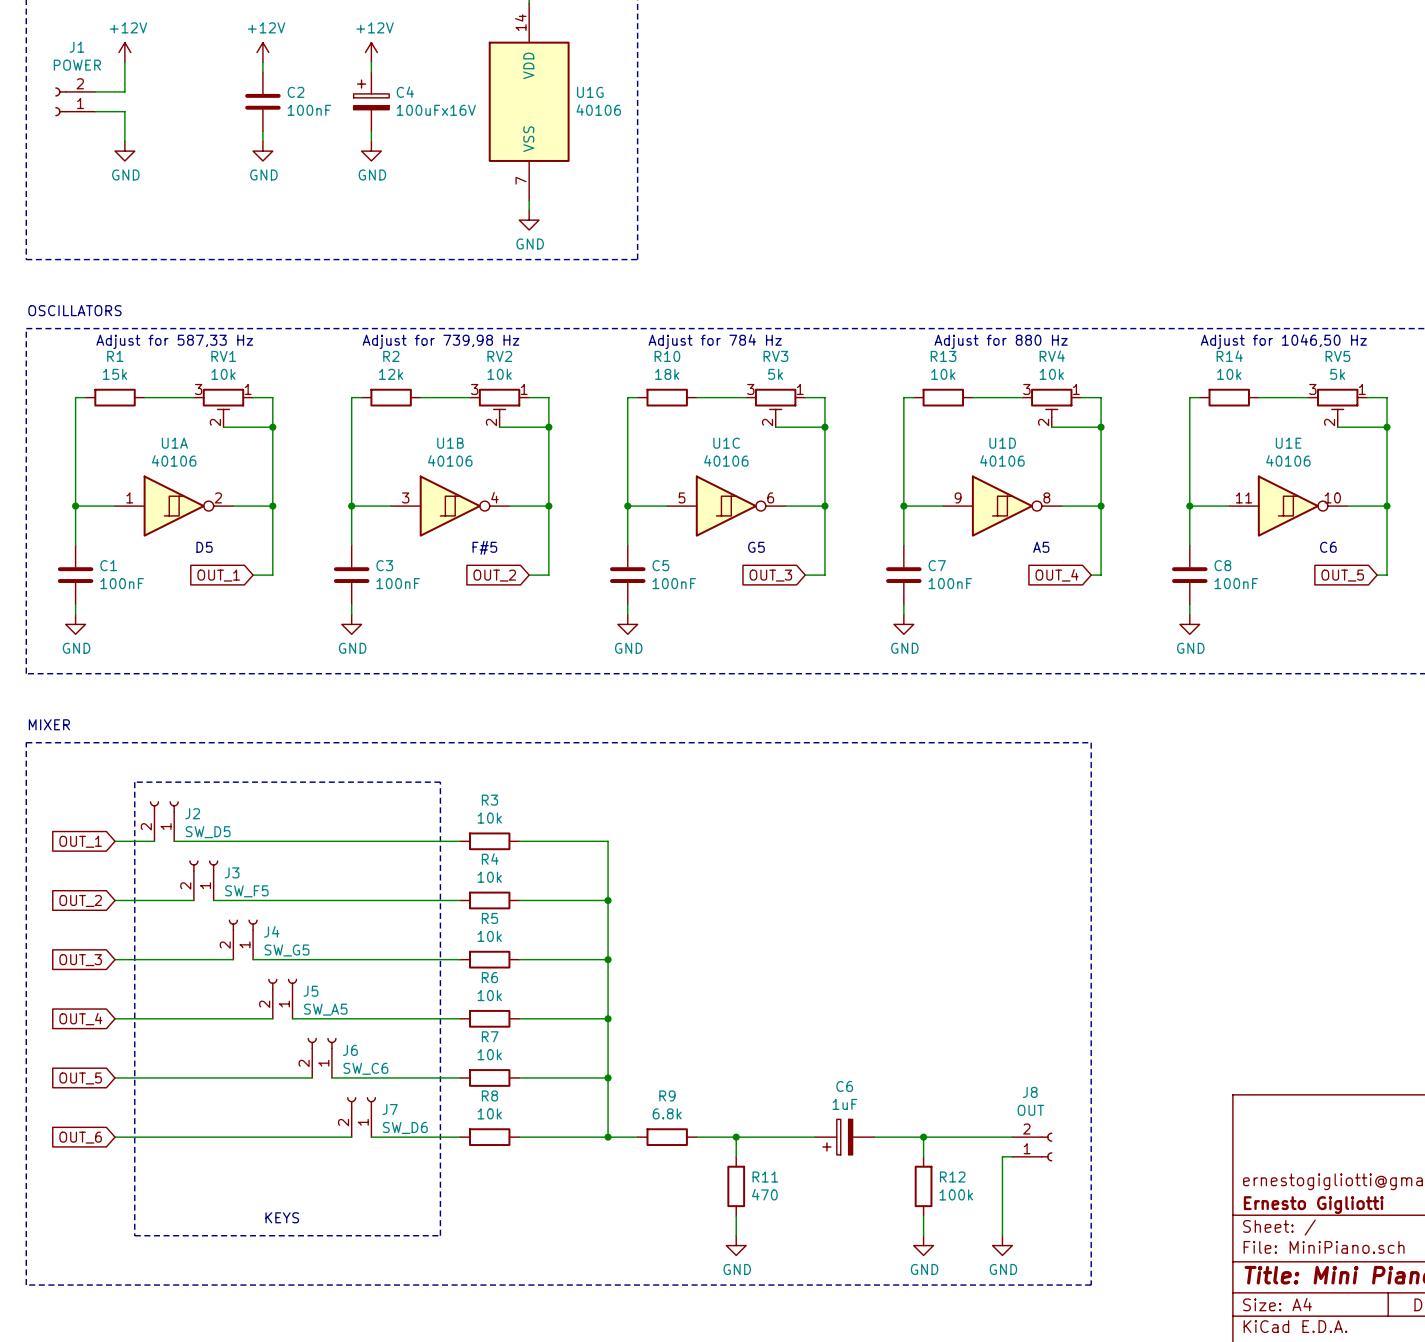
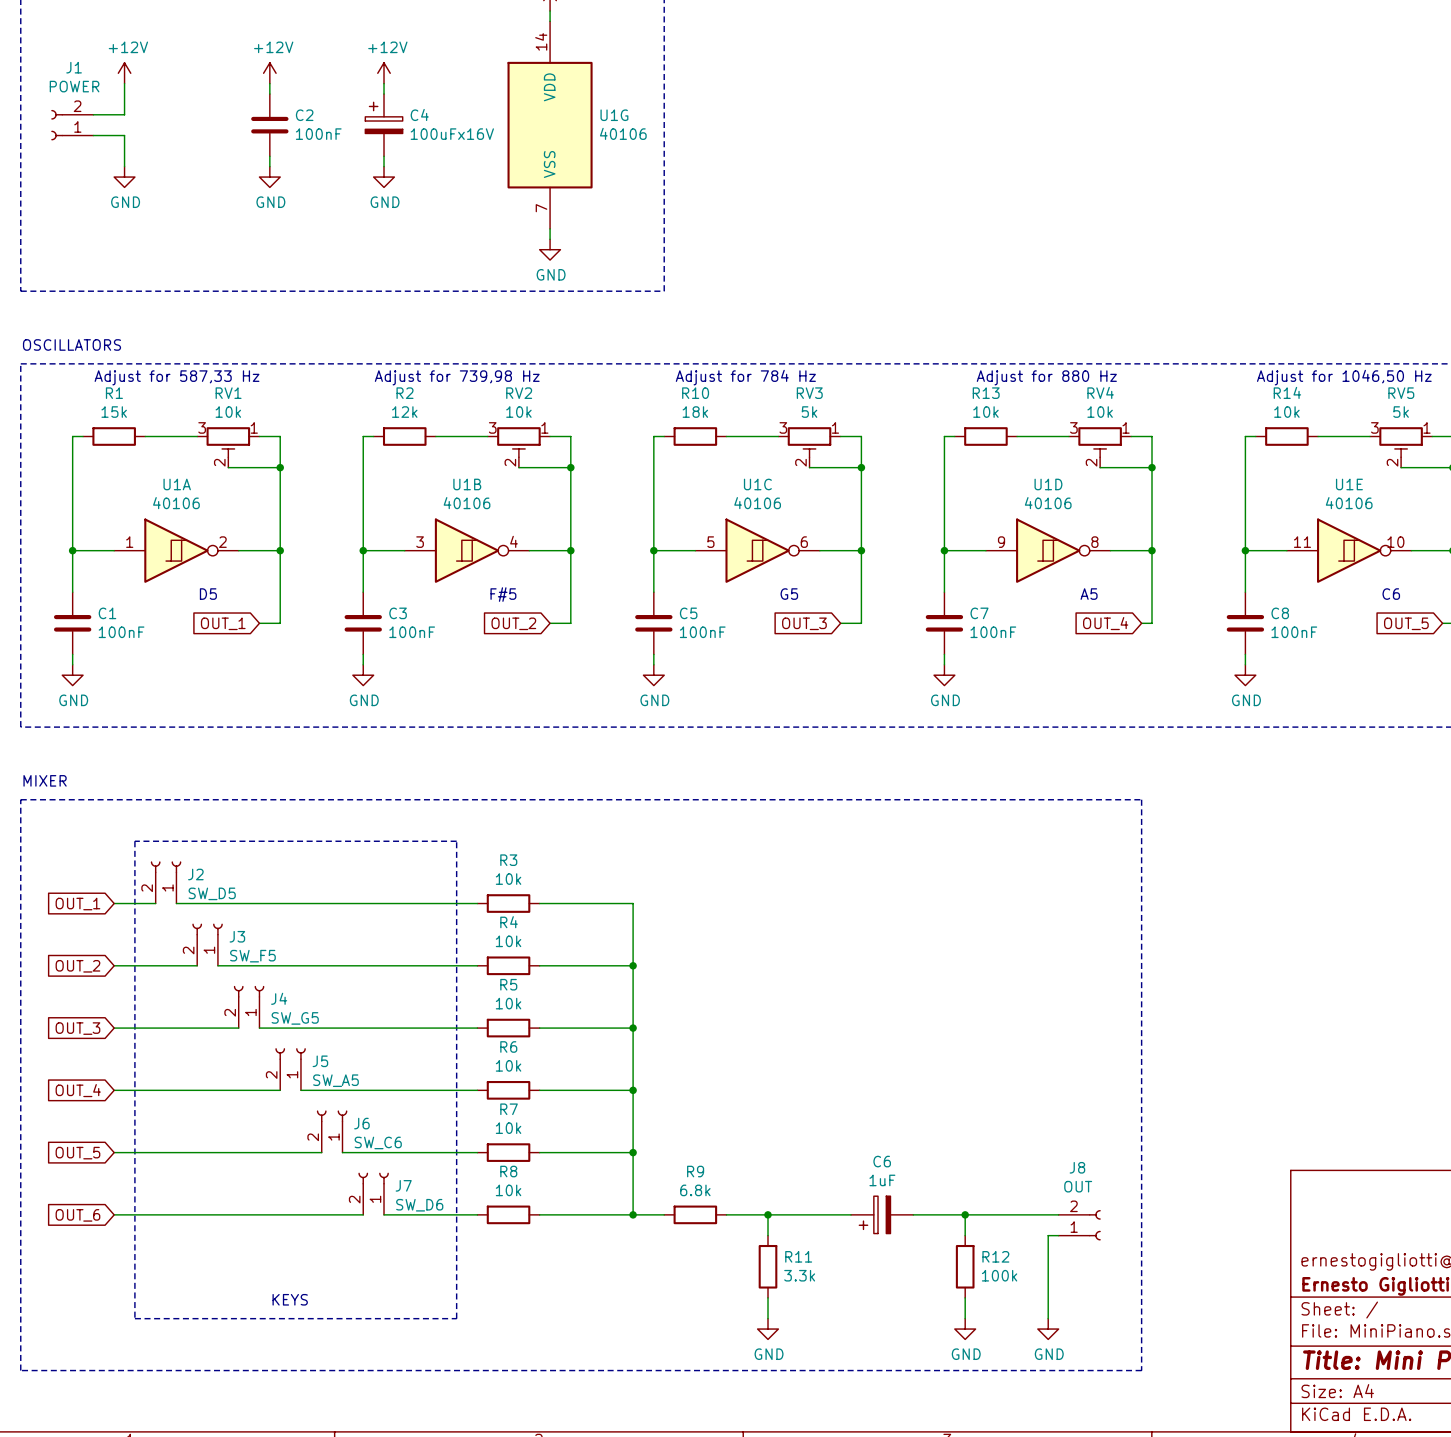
R11 value: 470 (764, 1194) -> 3.3k (799, 1275)

